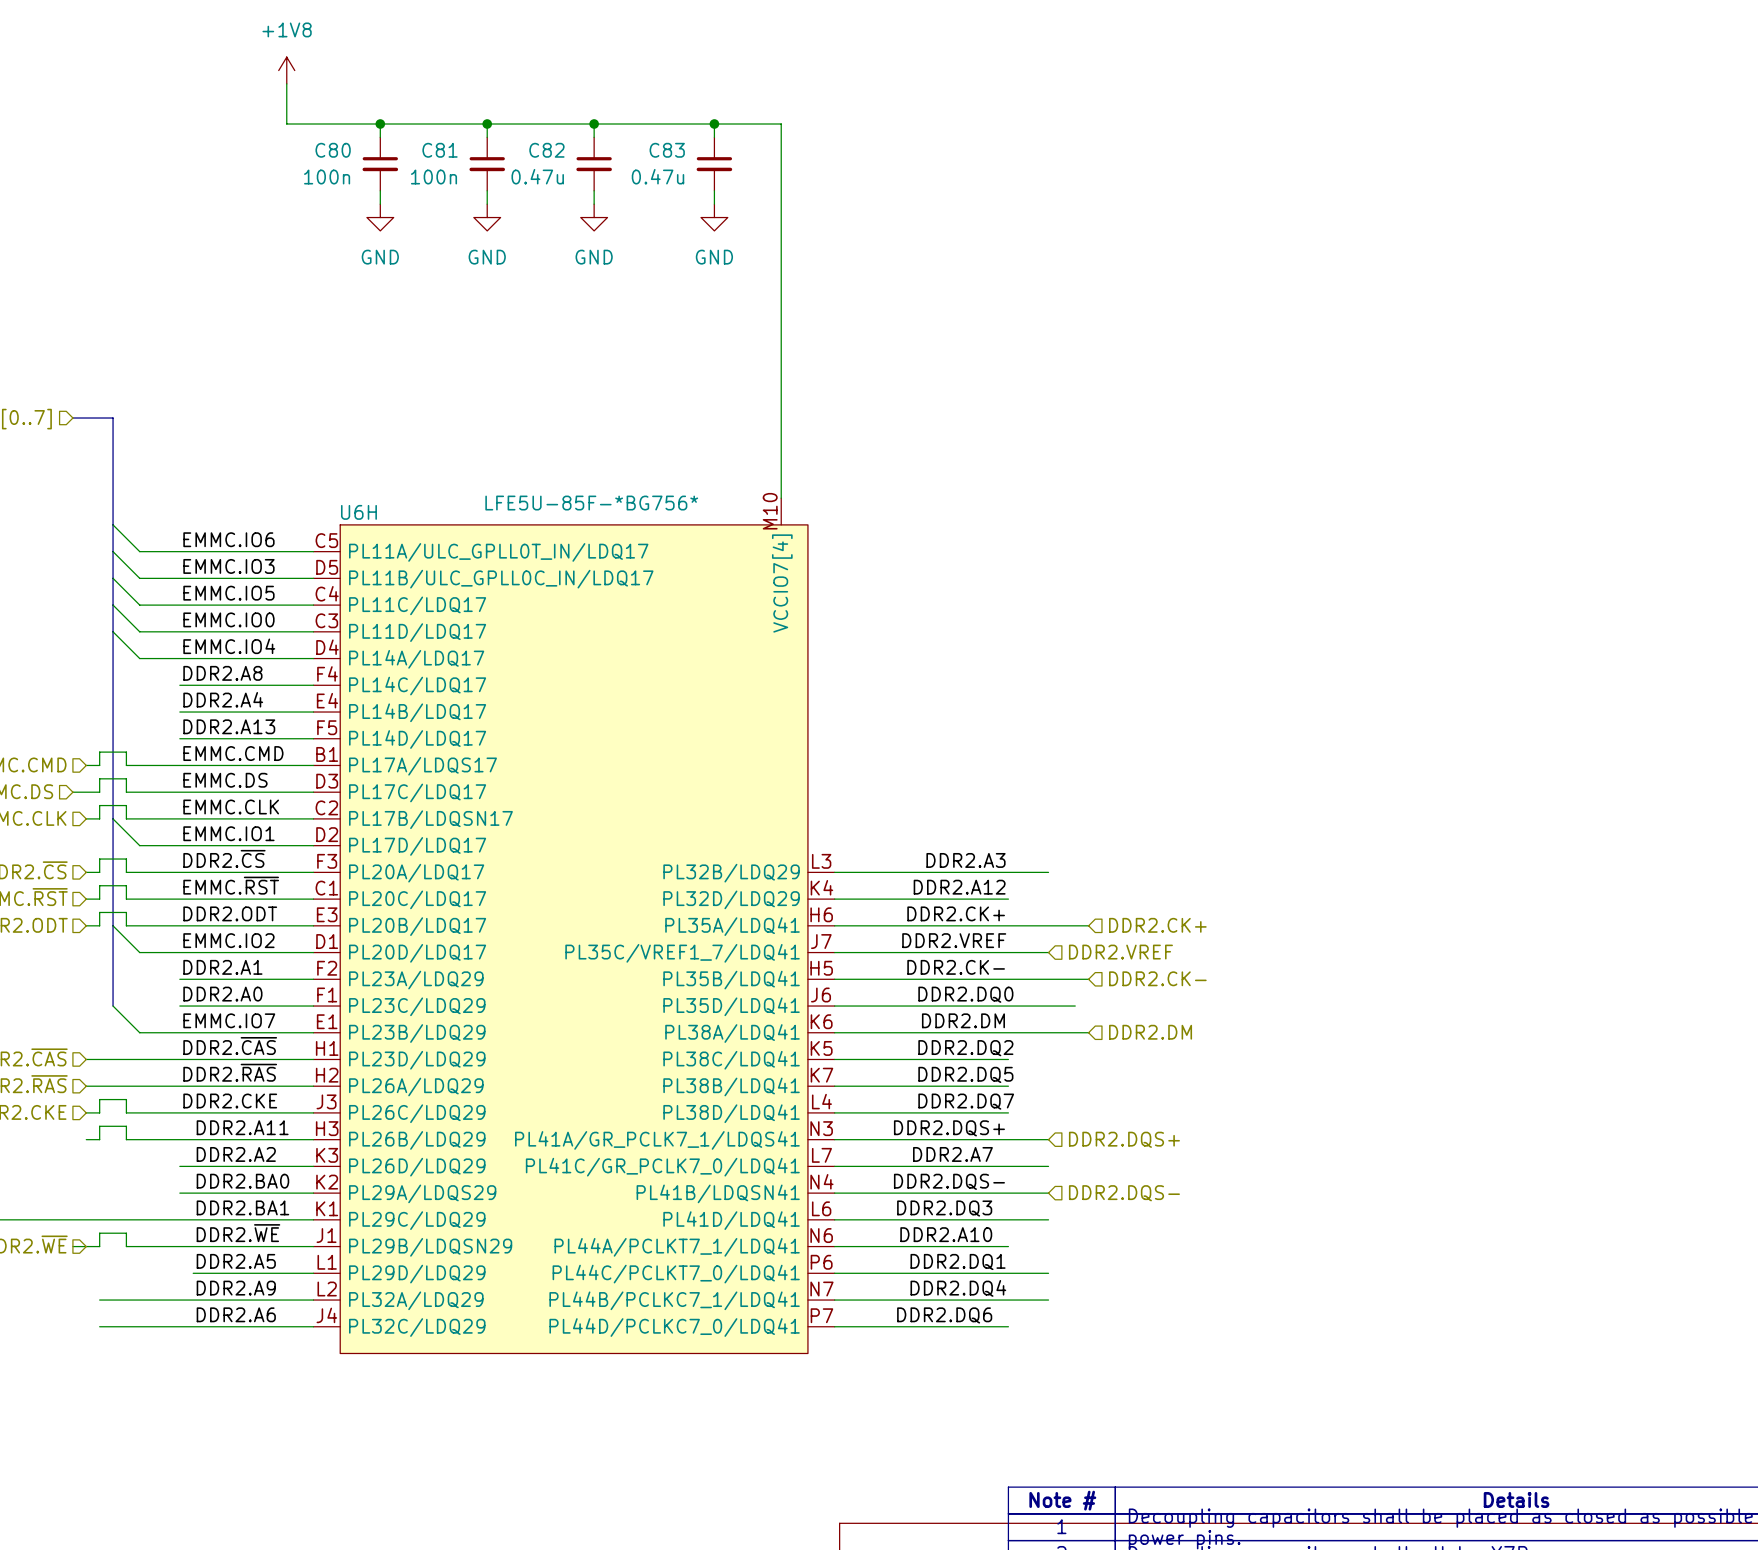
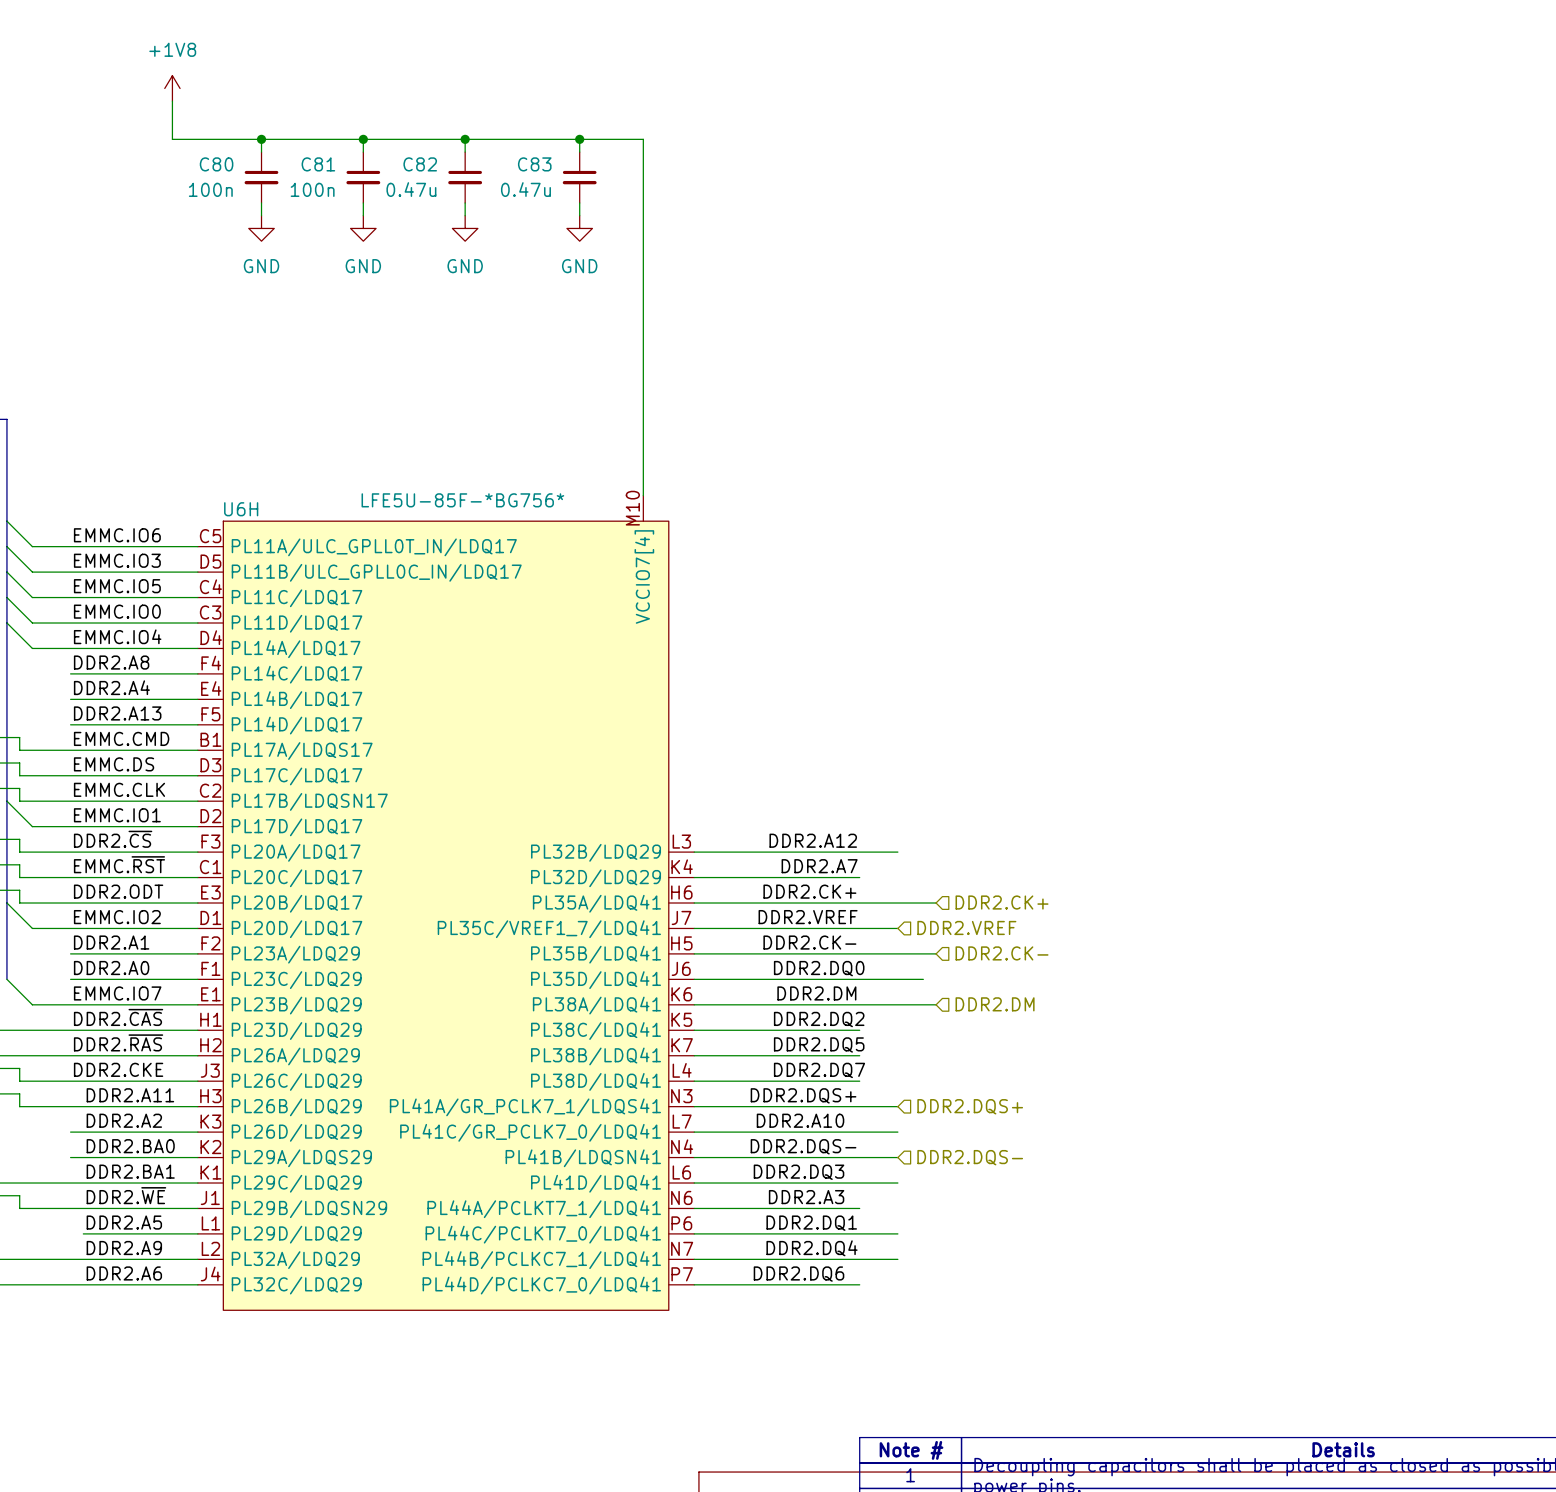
label: DDR2.A3 (966, 860) -> DDR2.A12 (813, 840)
label: DDR2.A12 (959, 887) -> DDR2.A7 (819, 866)
label: DDR2.A7 (952, 1154) -> DDR2.A10 (800, 1120)
label: DDR2.A10 (946, 1234) -> DDR2.A3 (806, 1197)

